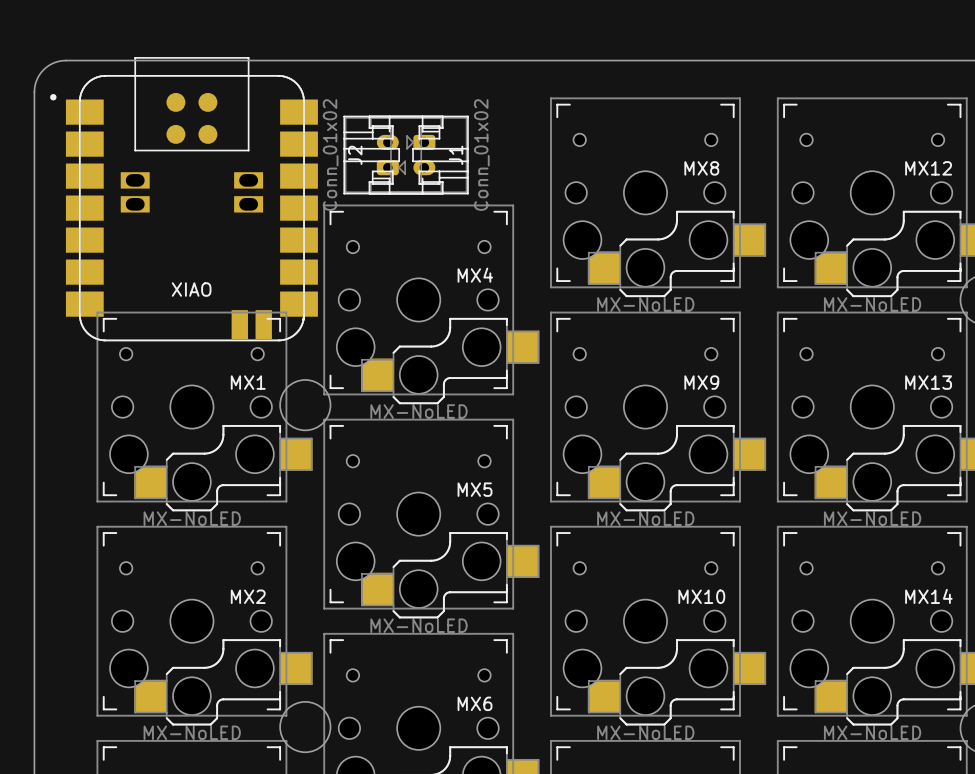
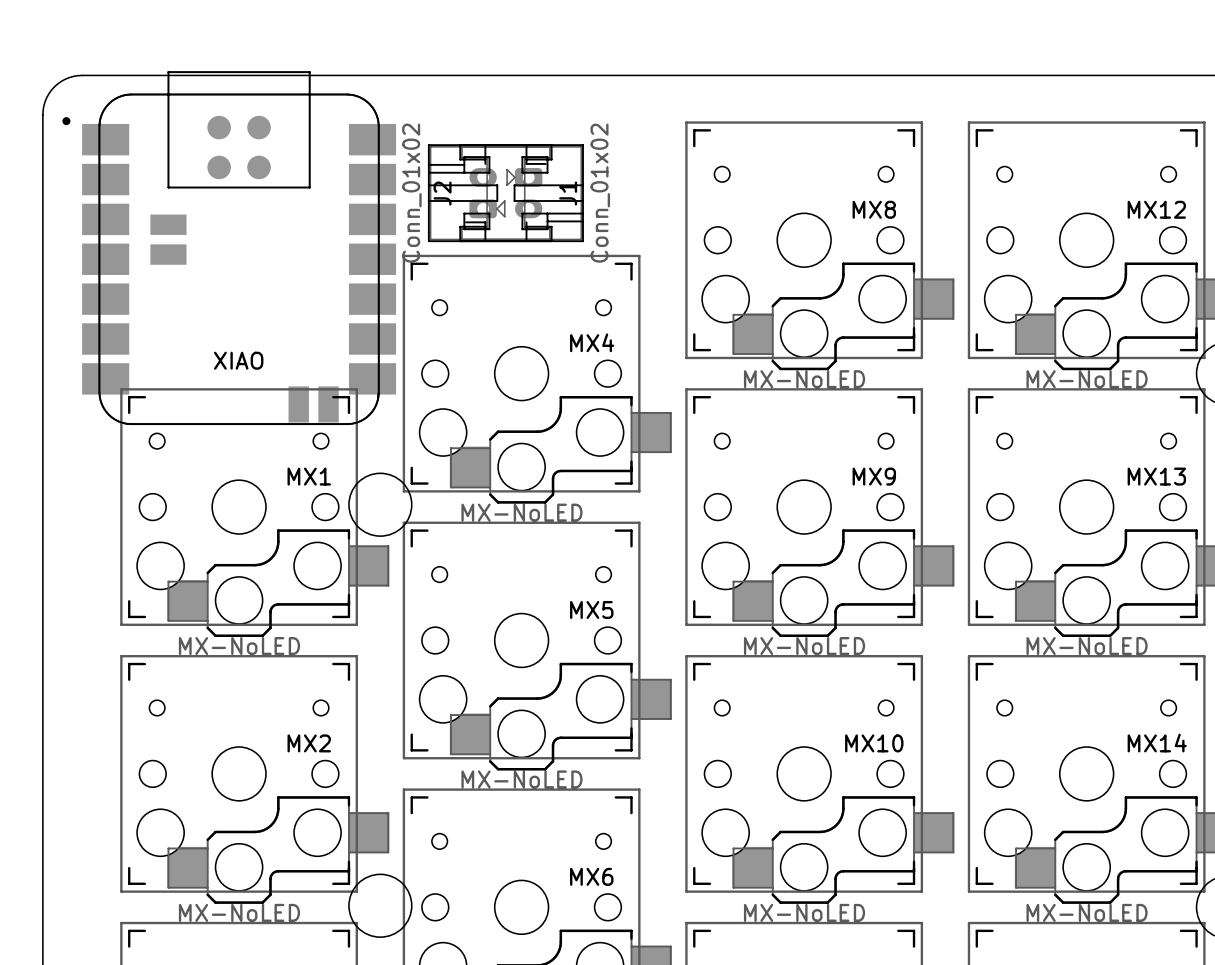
part footprint: [50, 57, 318, 342] -> [62, 71, 397, 426]
part: (248, 192) -> none

